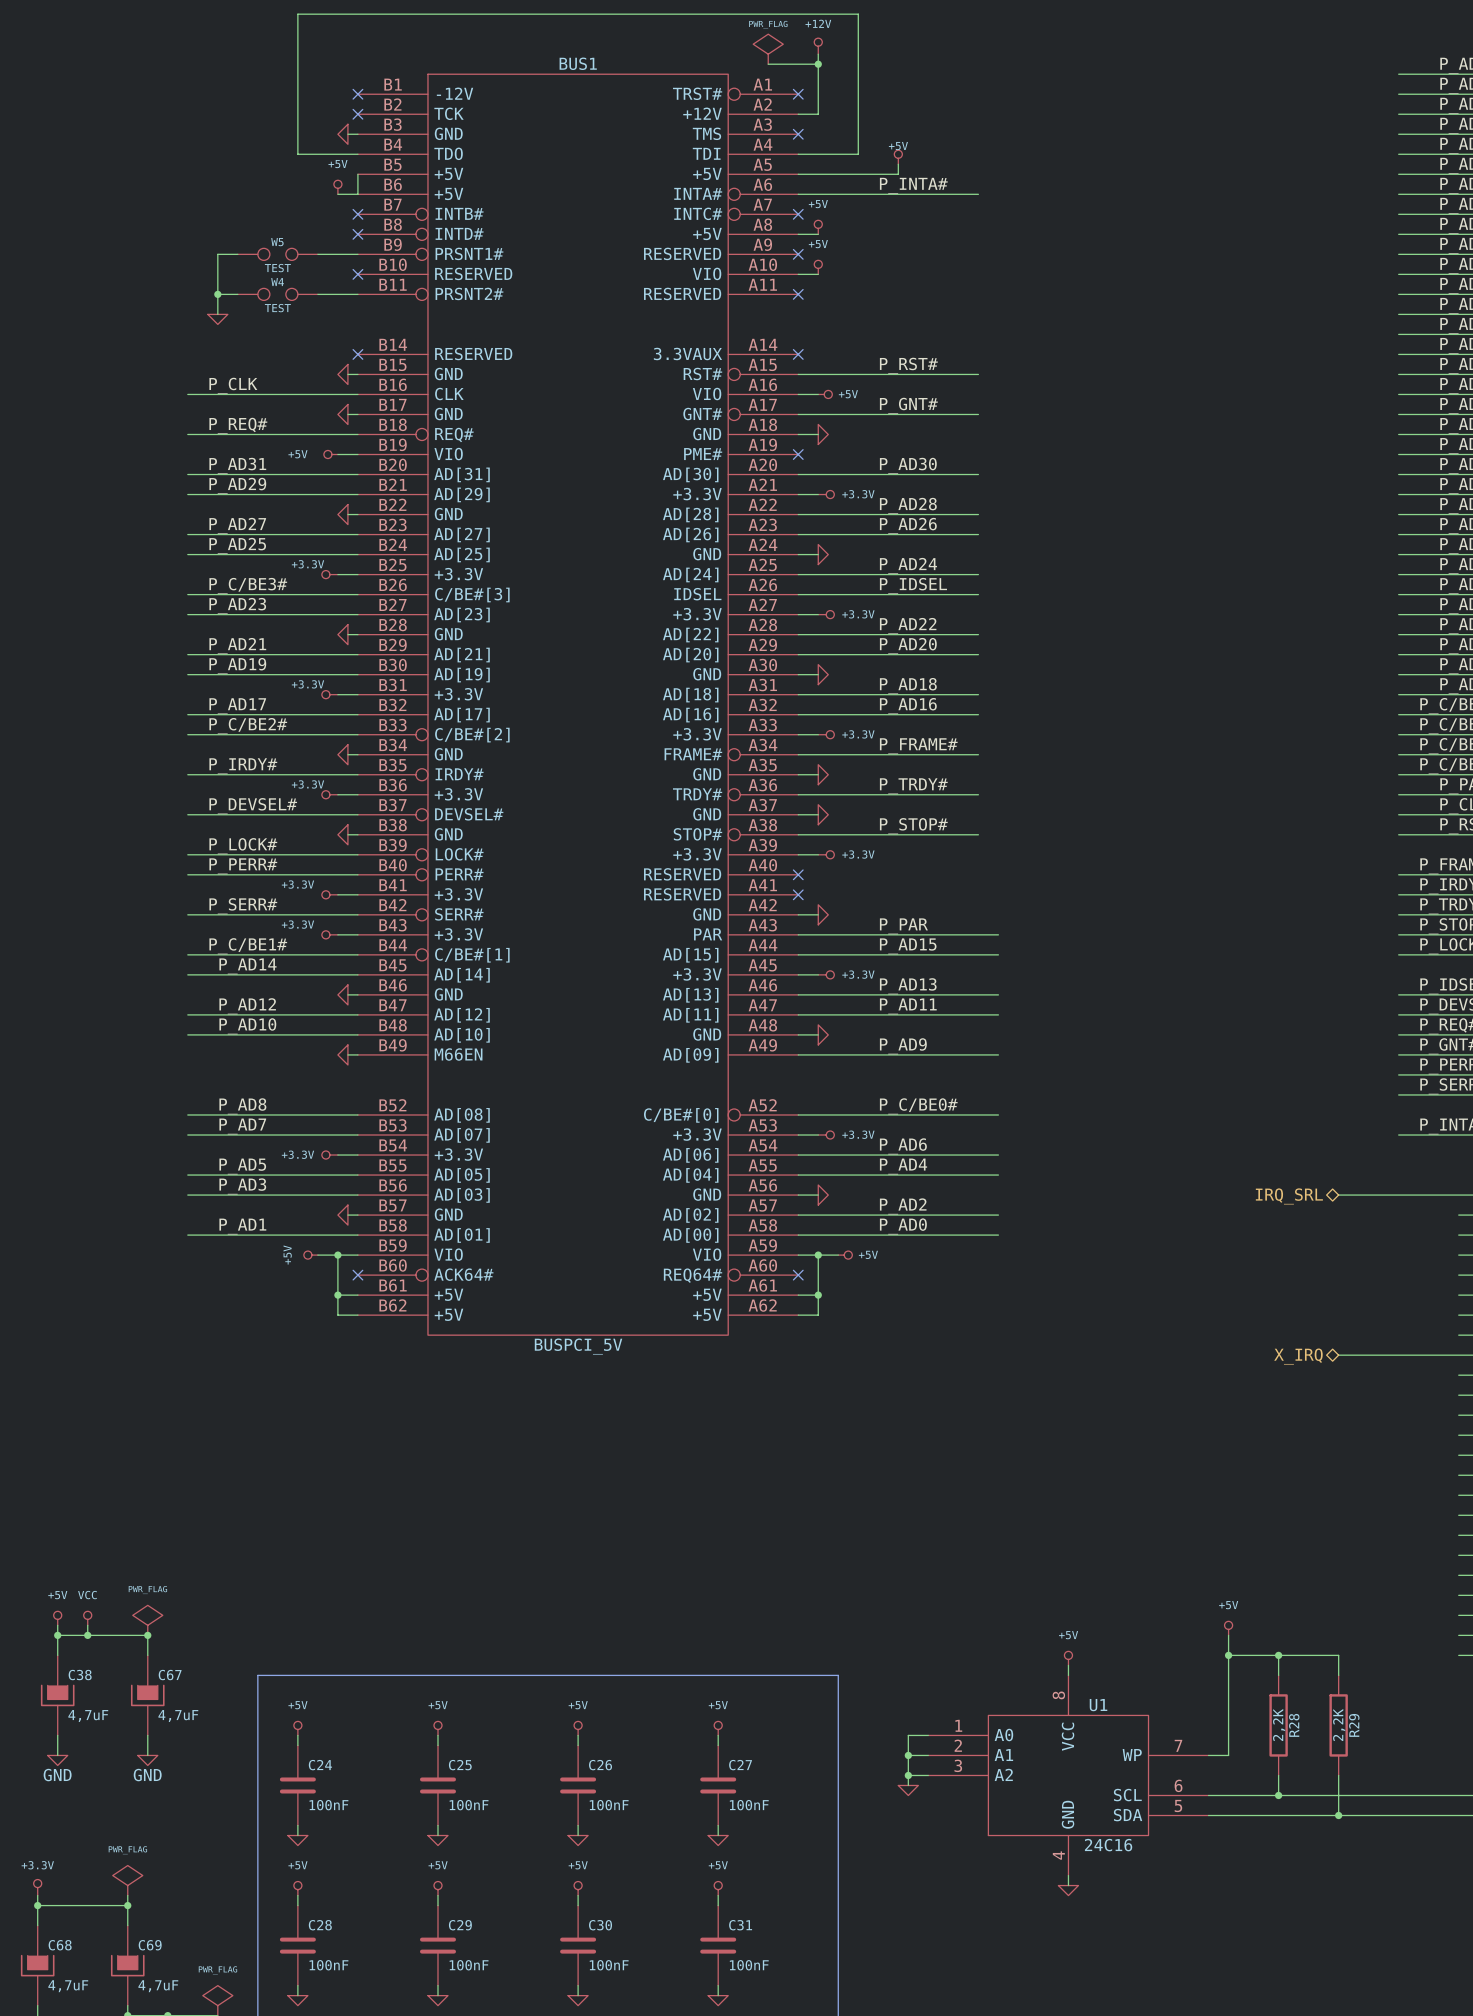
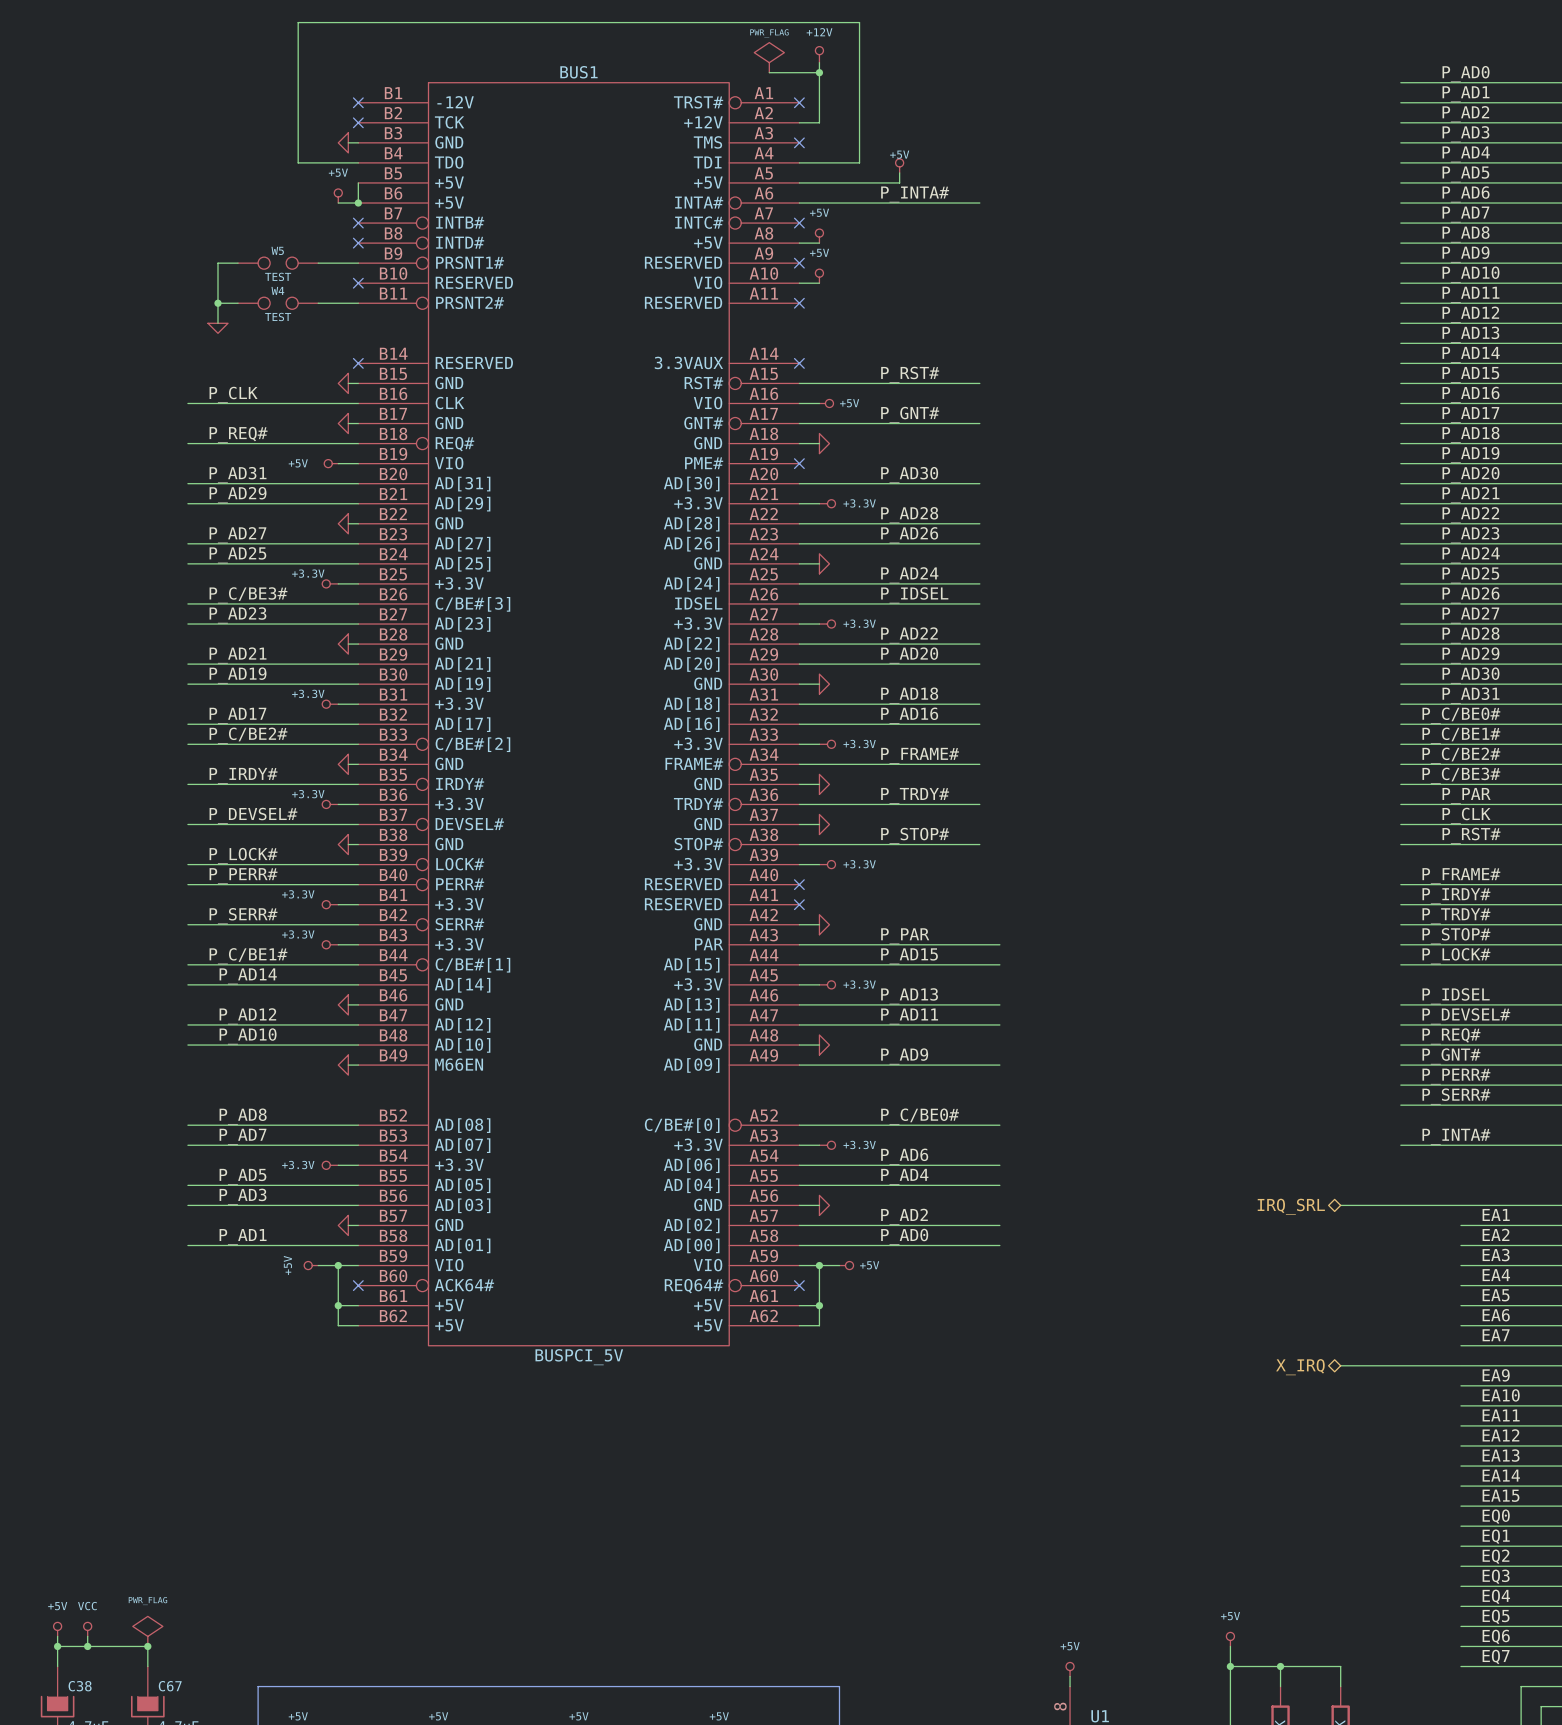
junction: none -> (358, 203)

